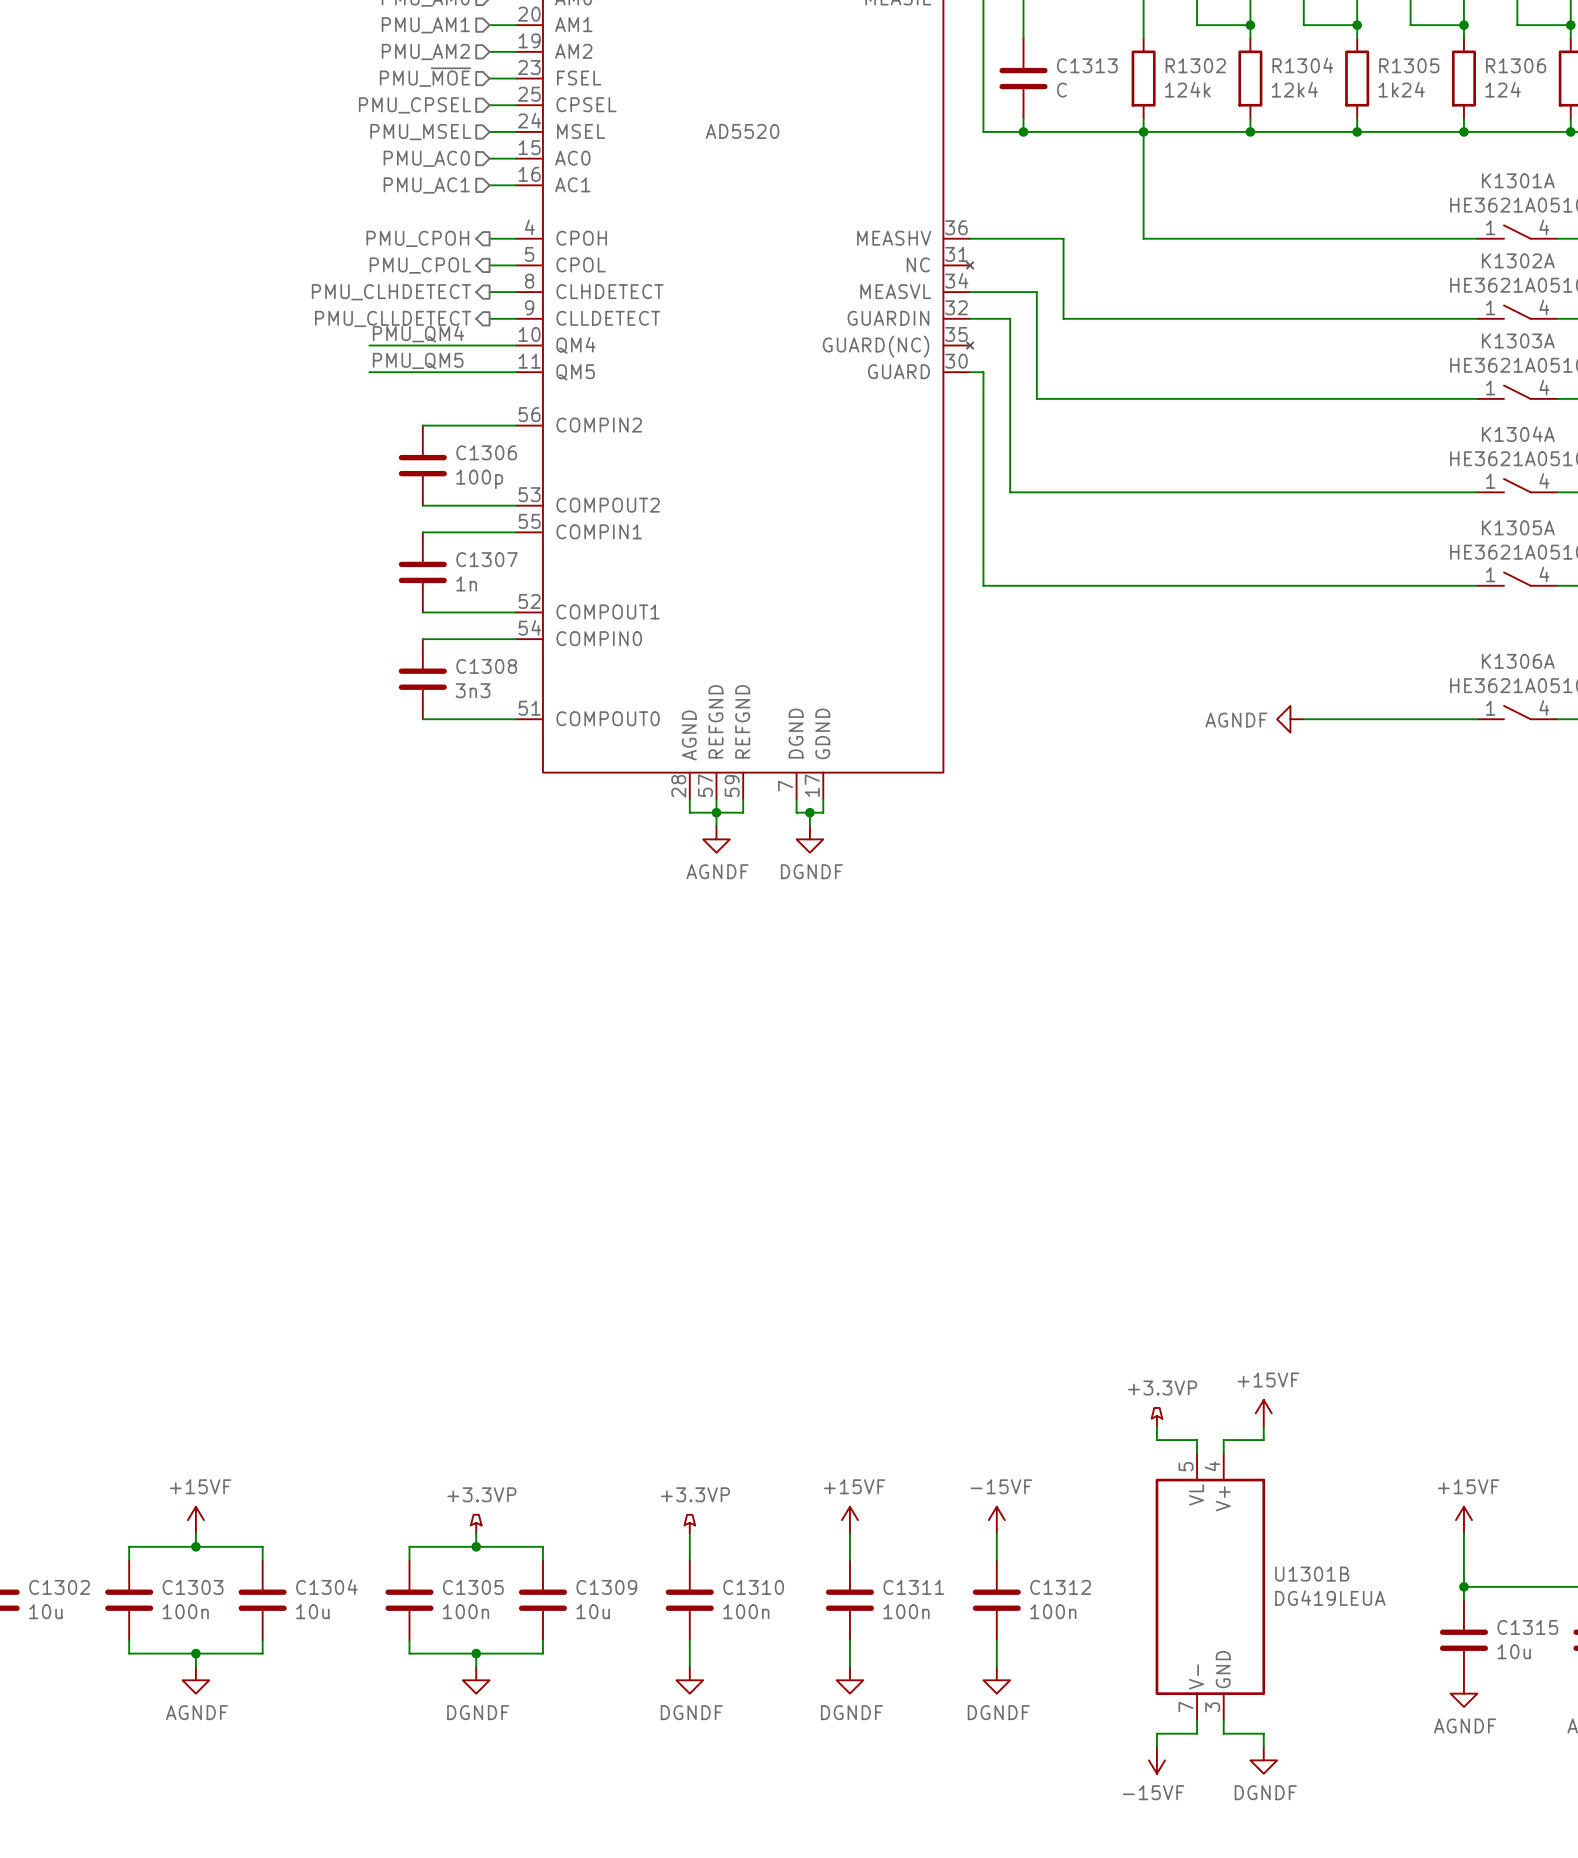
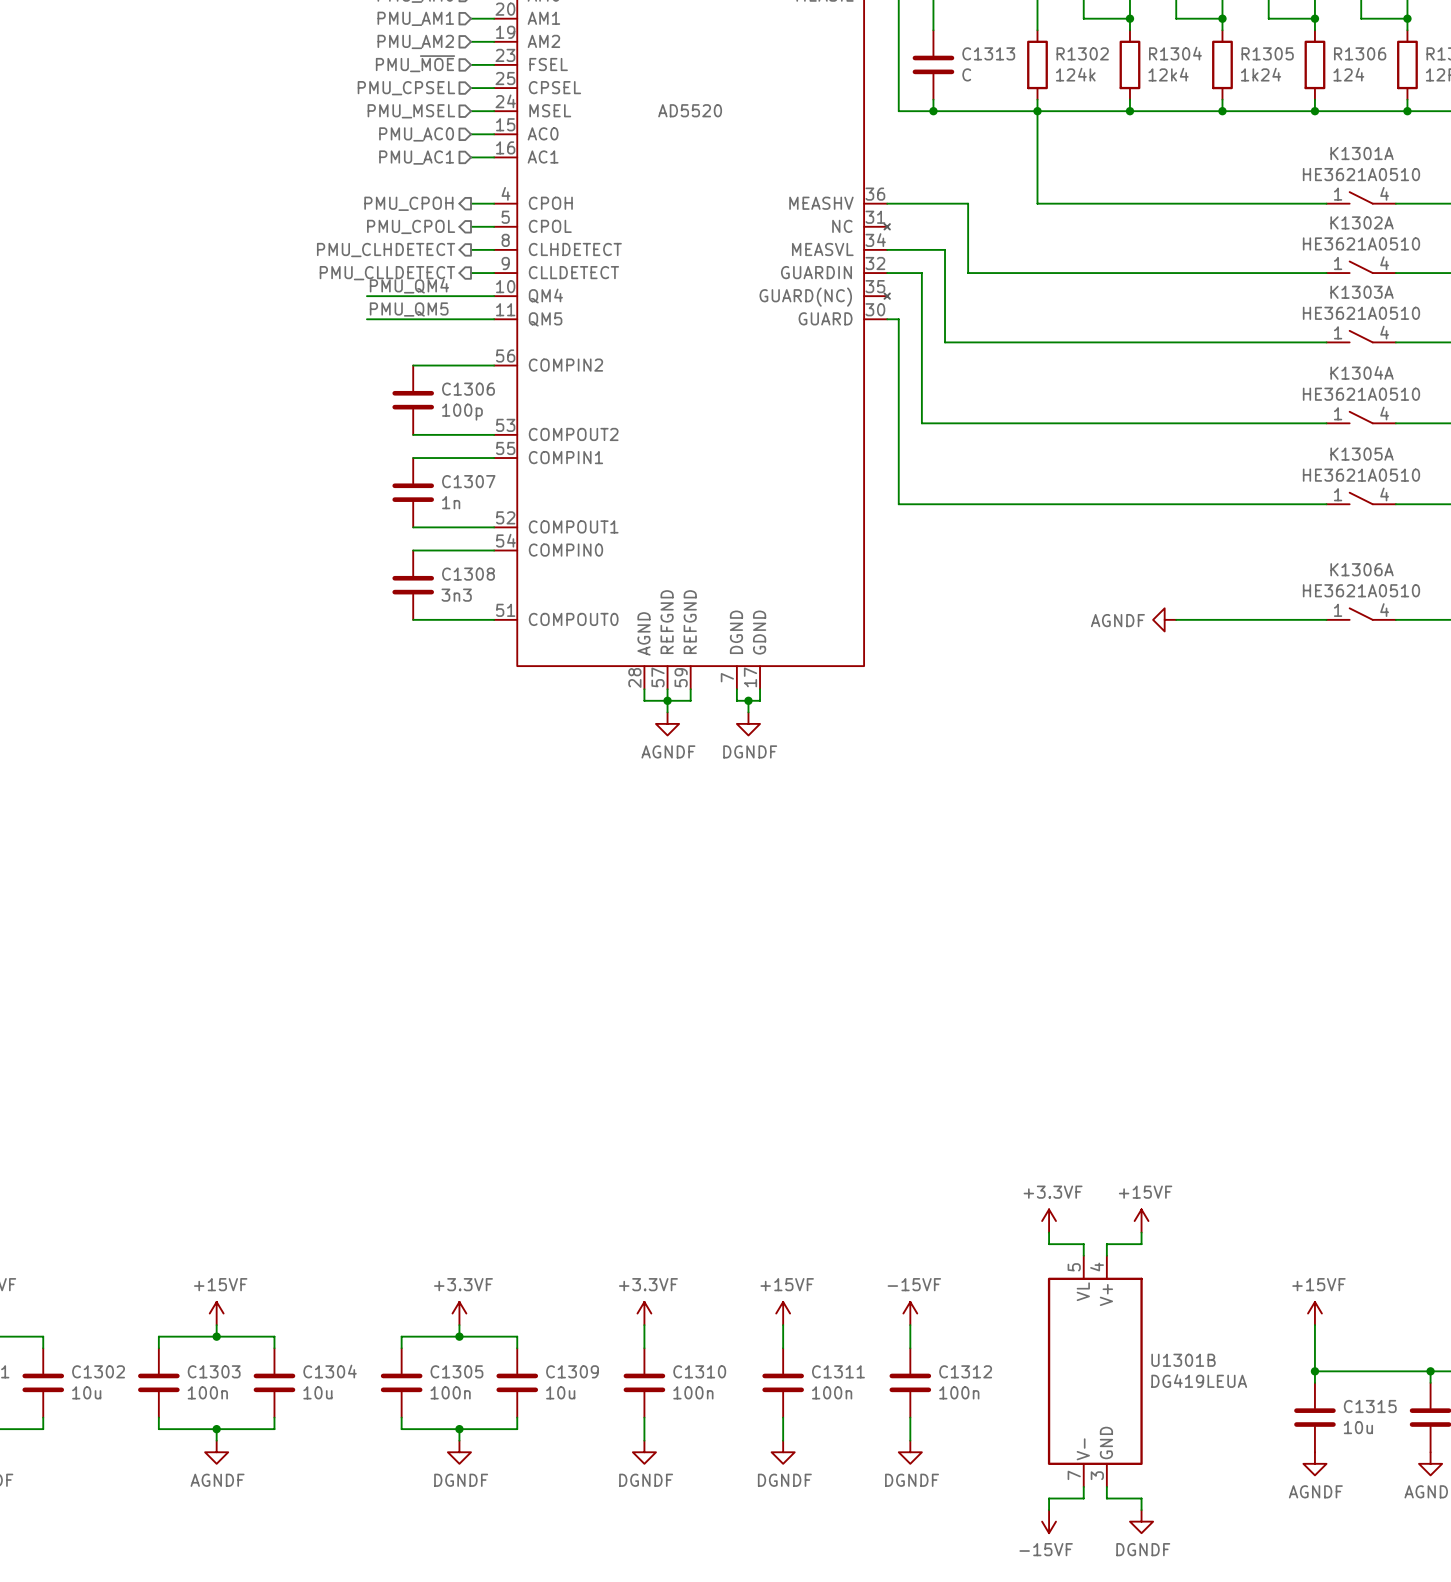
power symbol: +3.3VP (1156, 1417) -> +3.3VF (1049, 1221)
power symbol: +3.3VP (476, 1524) -> +3.3VF (459, 1313)
power symbol: +3.3VP (689, 1524) -> +3.3VF (644, 1313)

